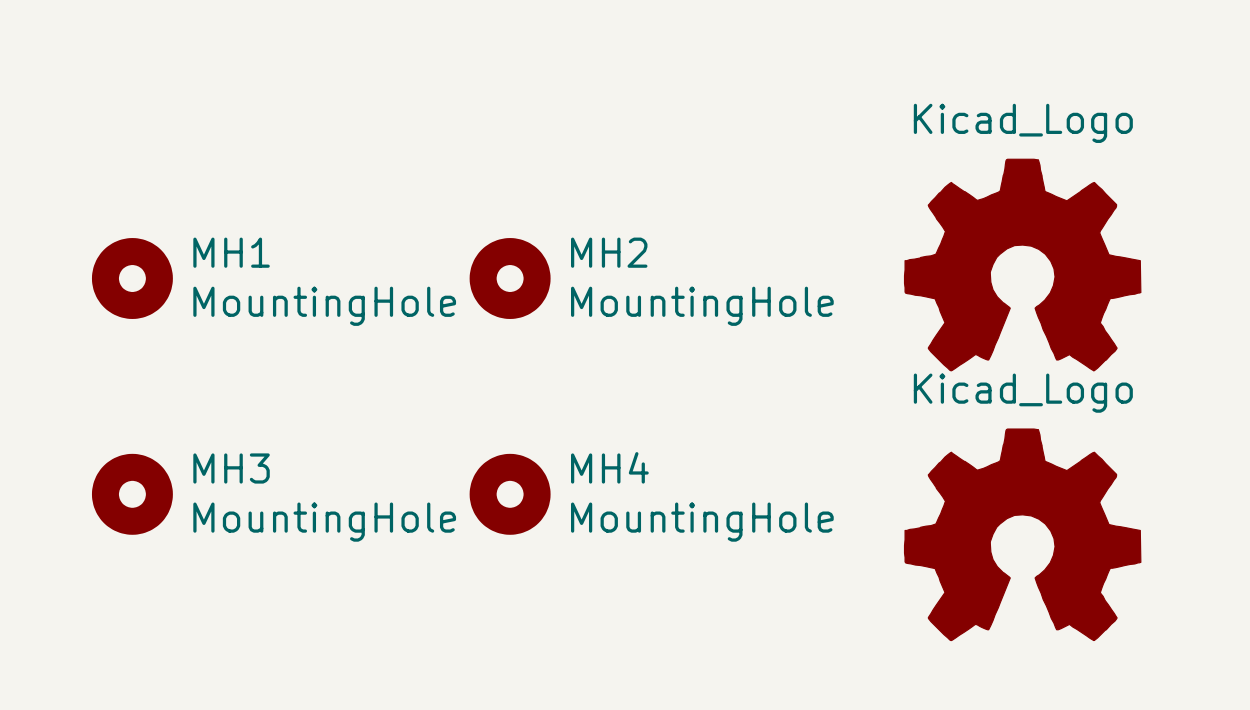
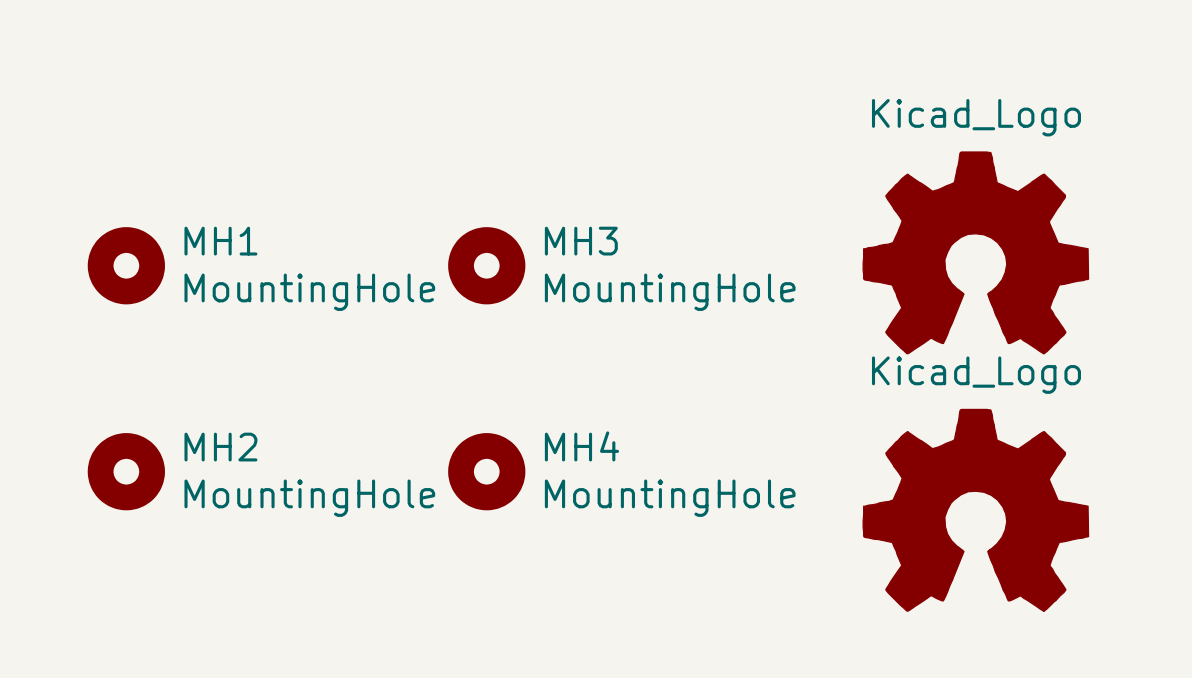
MH2 name: MH2 (609, 252) -> MH3 (581, 241)
MH3 name: MH3 (231, 468) -> MH2 (220, 447)

